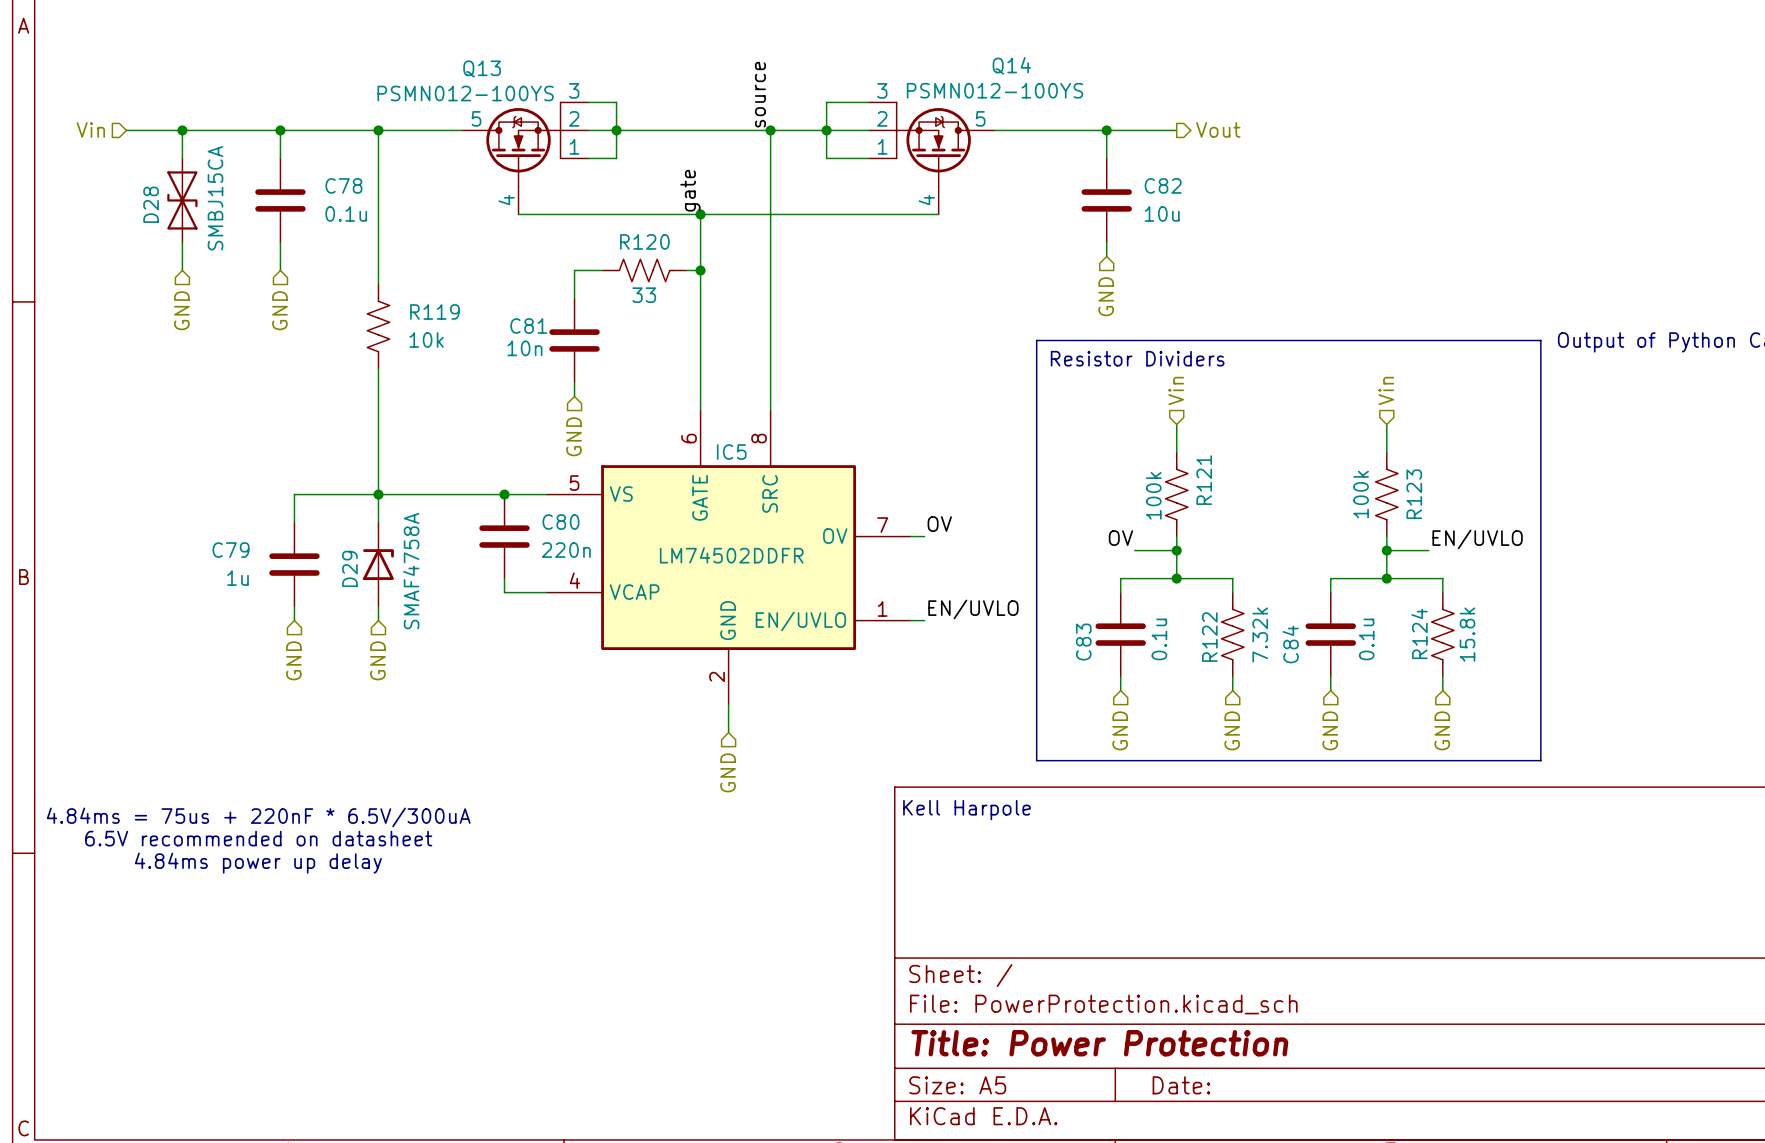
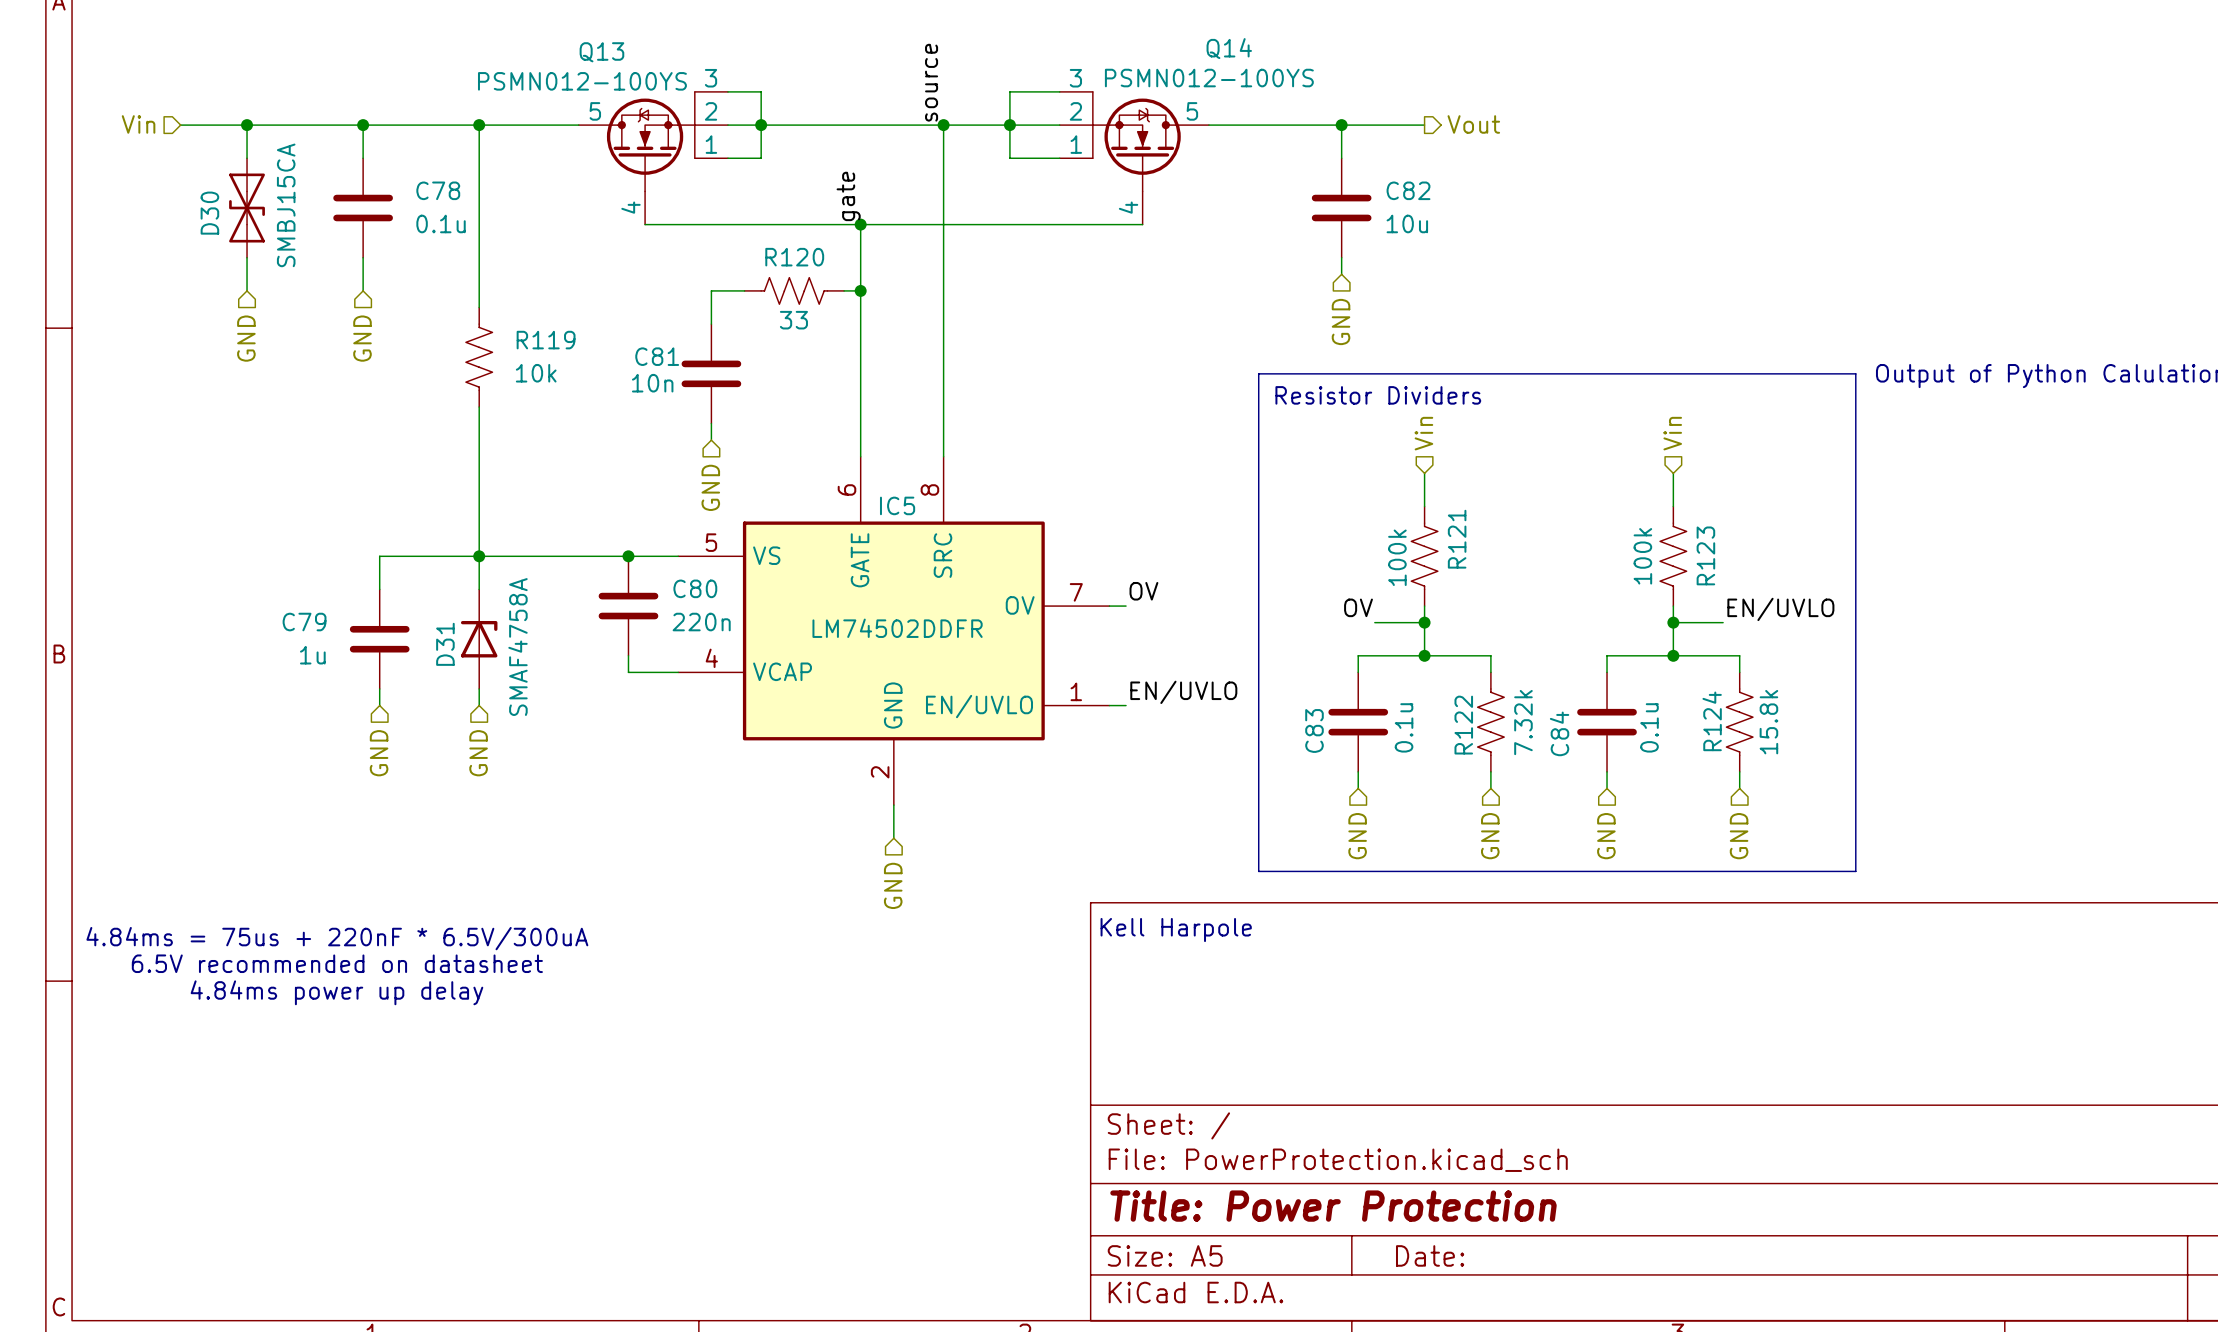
D28 name: D28 (151, 204) -> D30 (209, 213)
D29 name: D29 (349, 568) -> D31 (445, 644)

